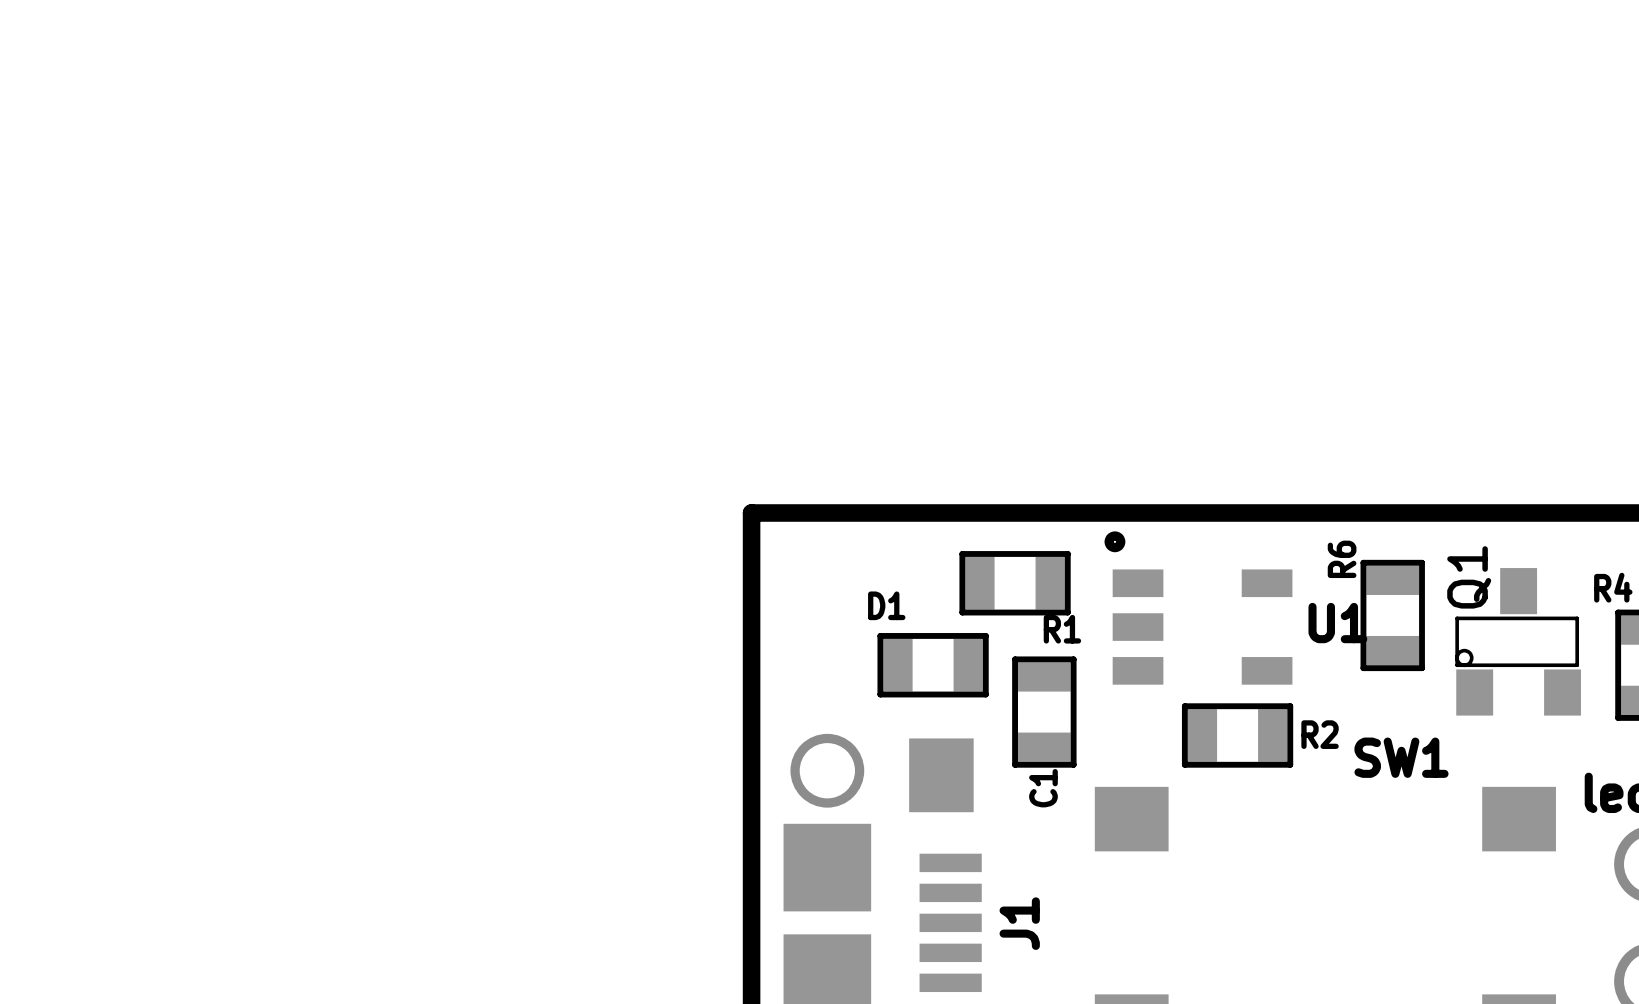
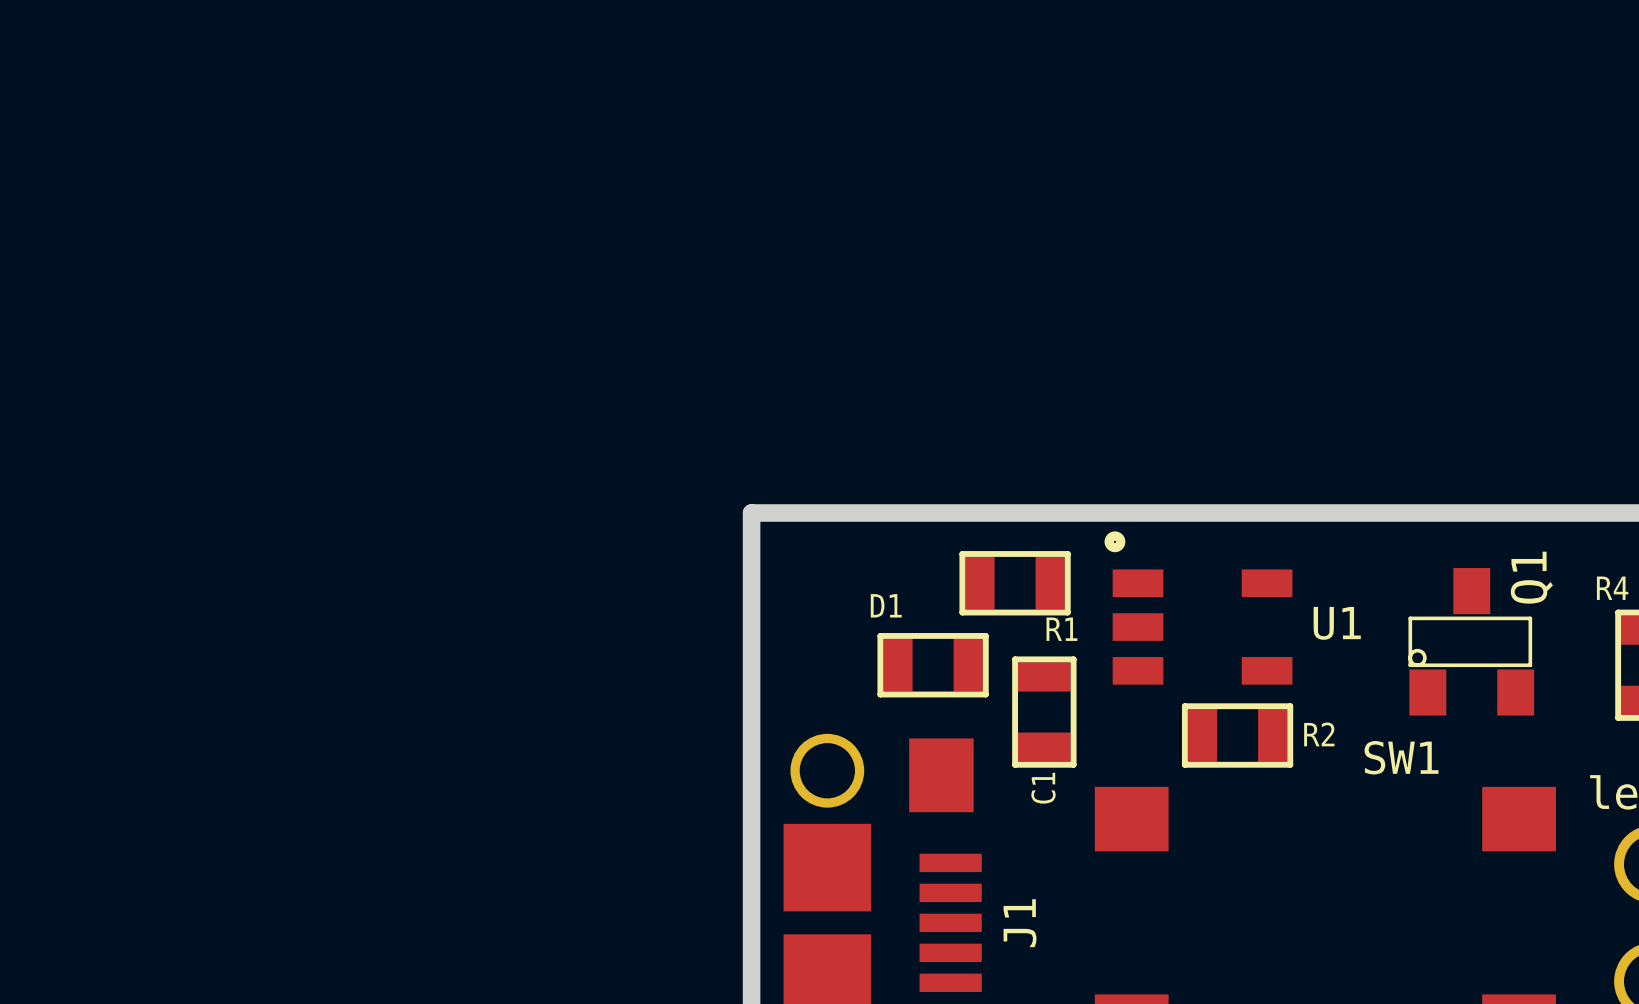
Q1 name position: Q1 (1469, 577) -> Q1 (1531, 577)
R6: (1392, 615) -> none
Q1 position: (1518, 641) -> (1471, 641)

